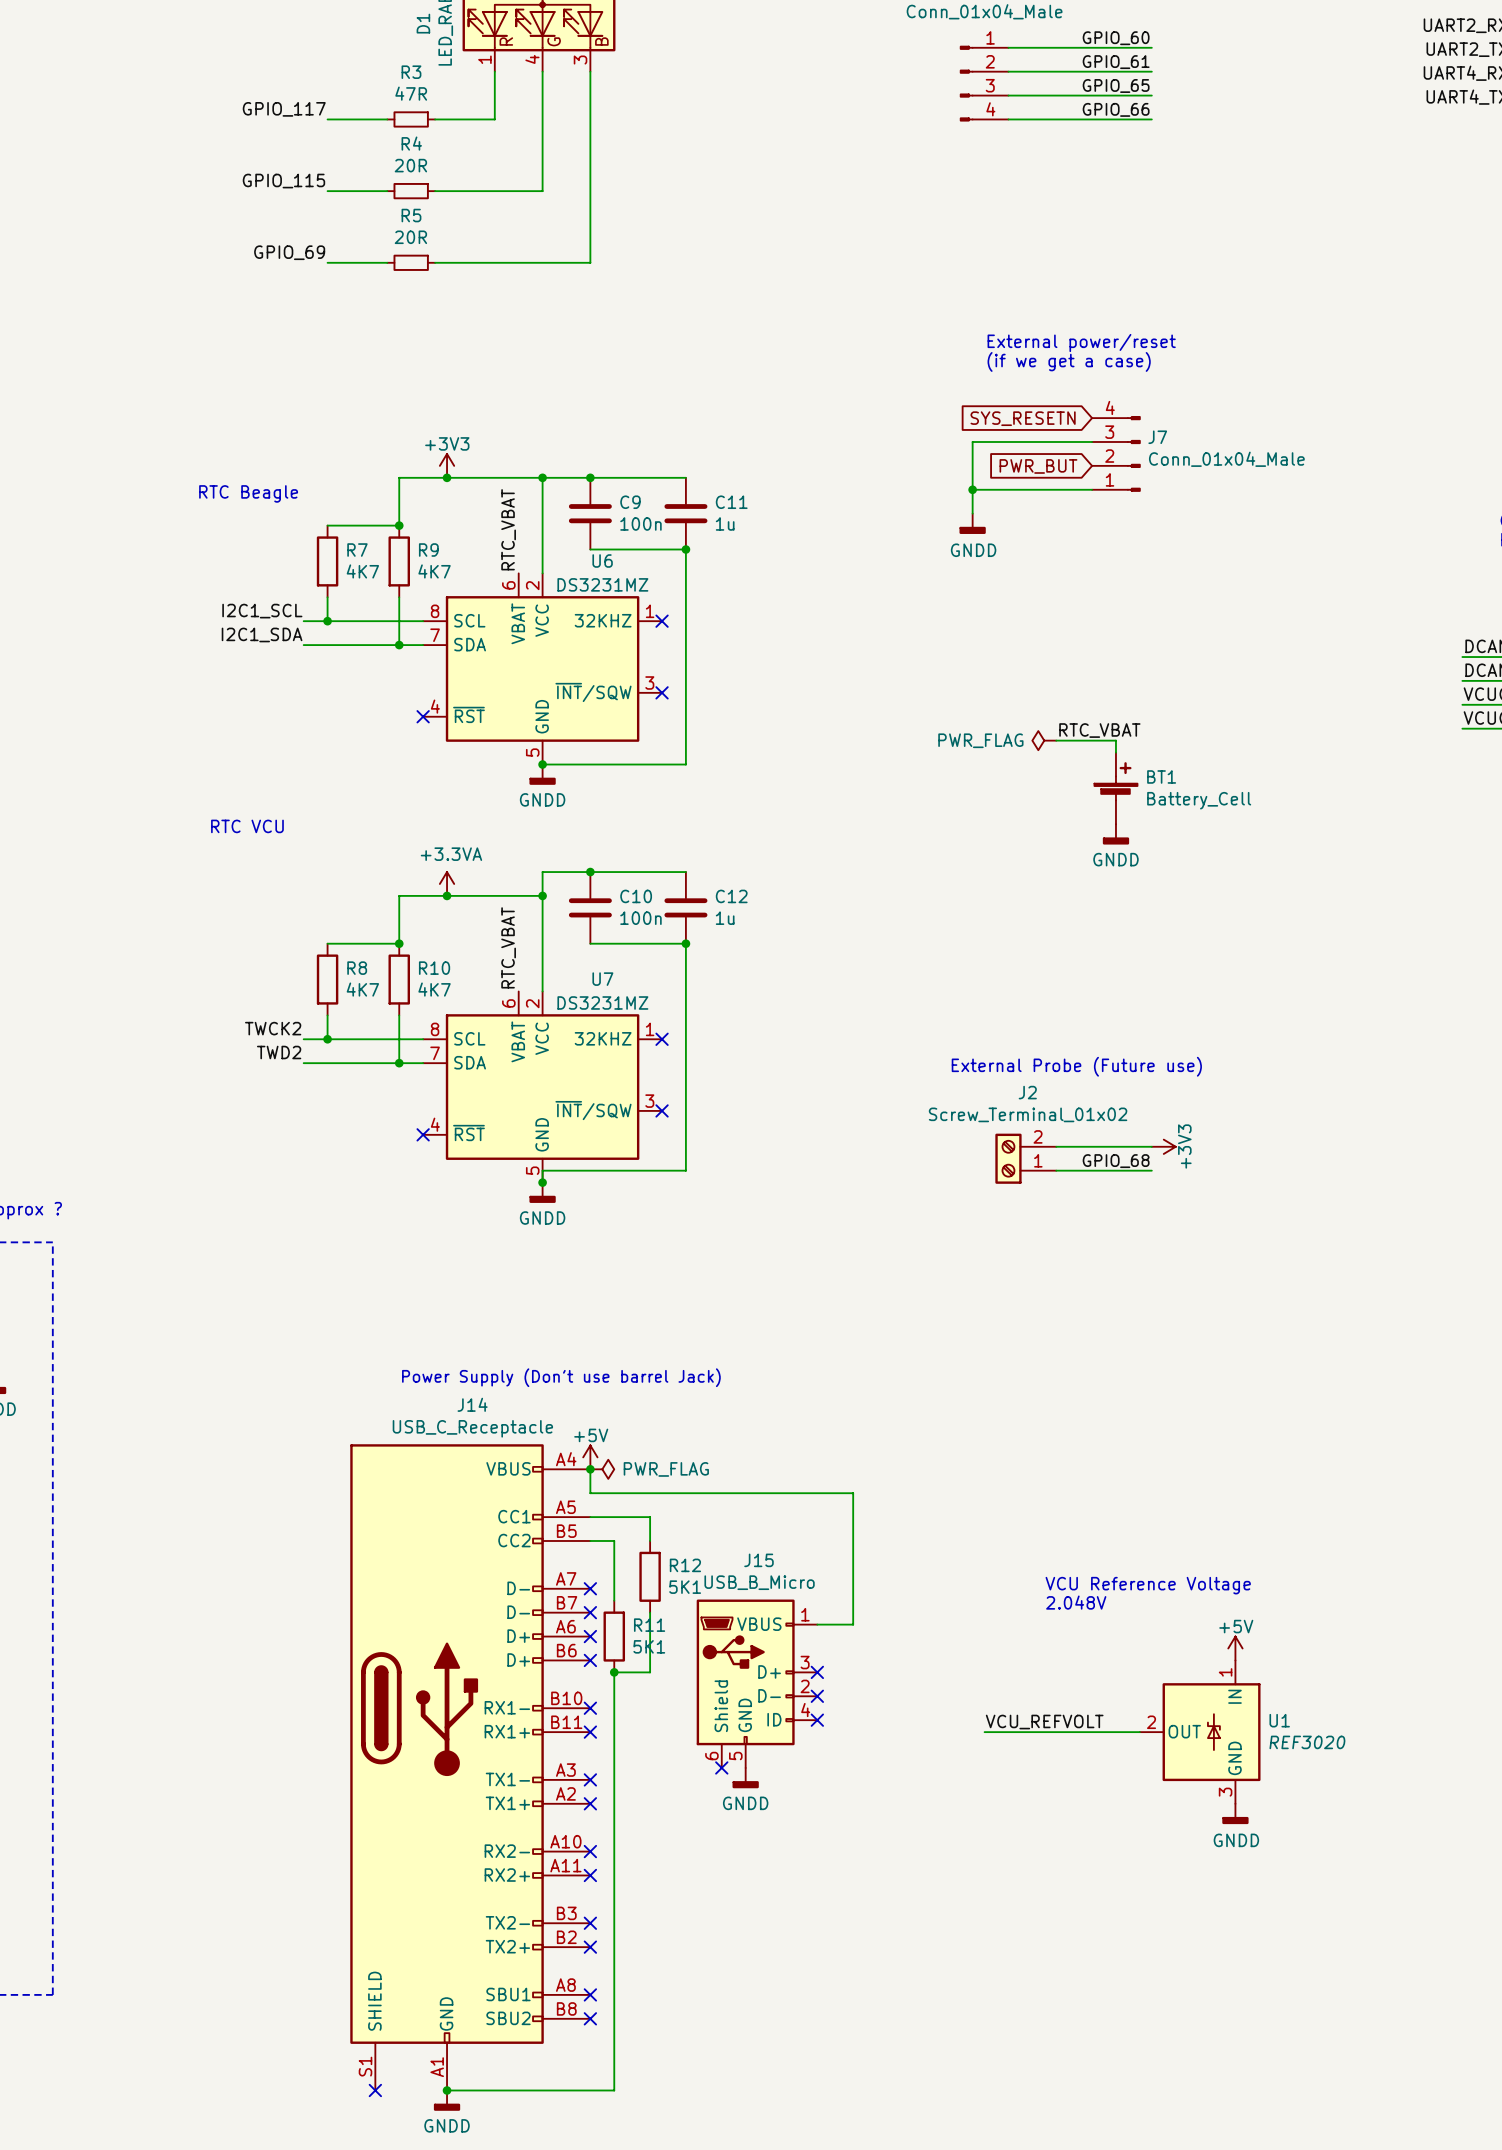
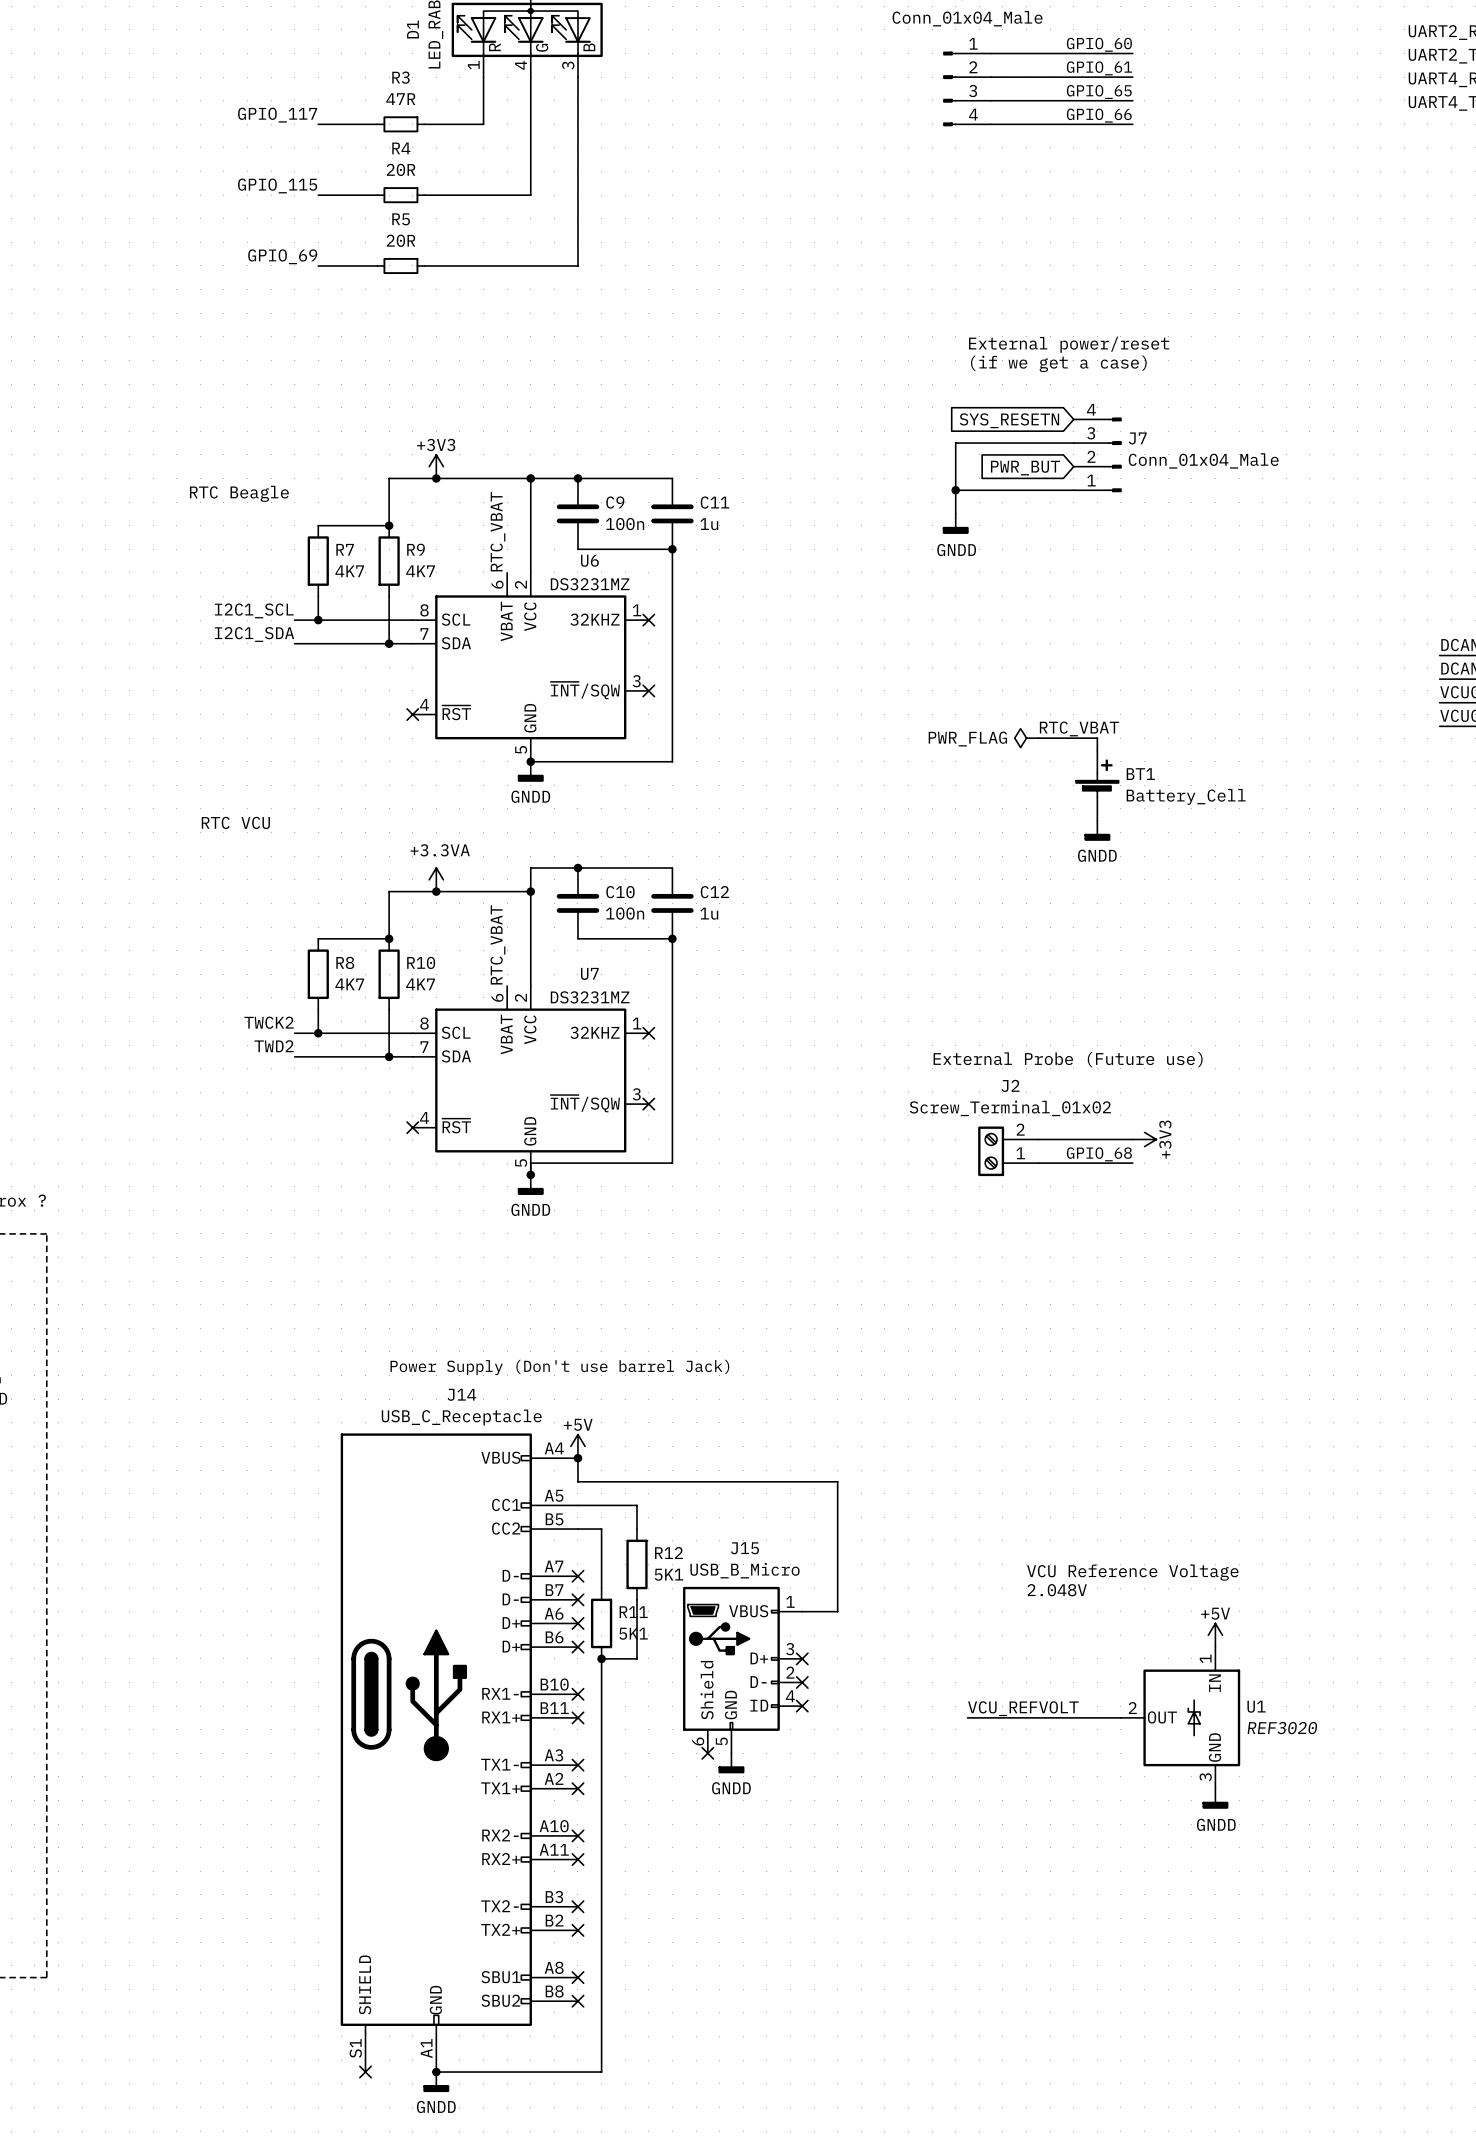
power symbol: PWR_FLAG (602, 1469) -> none

